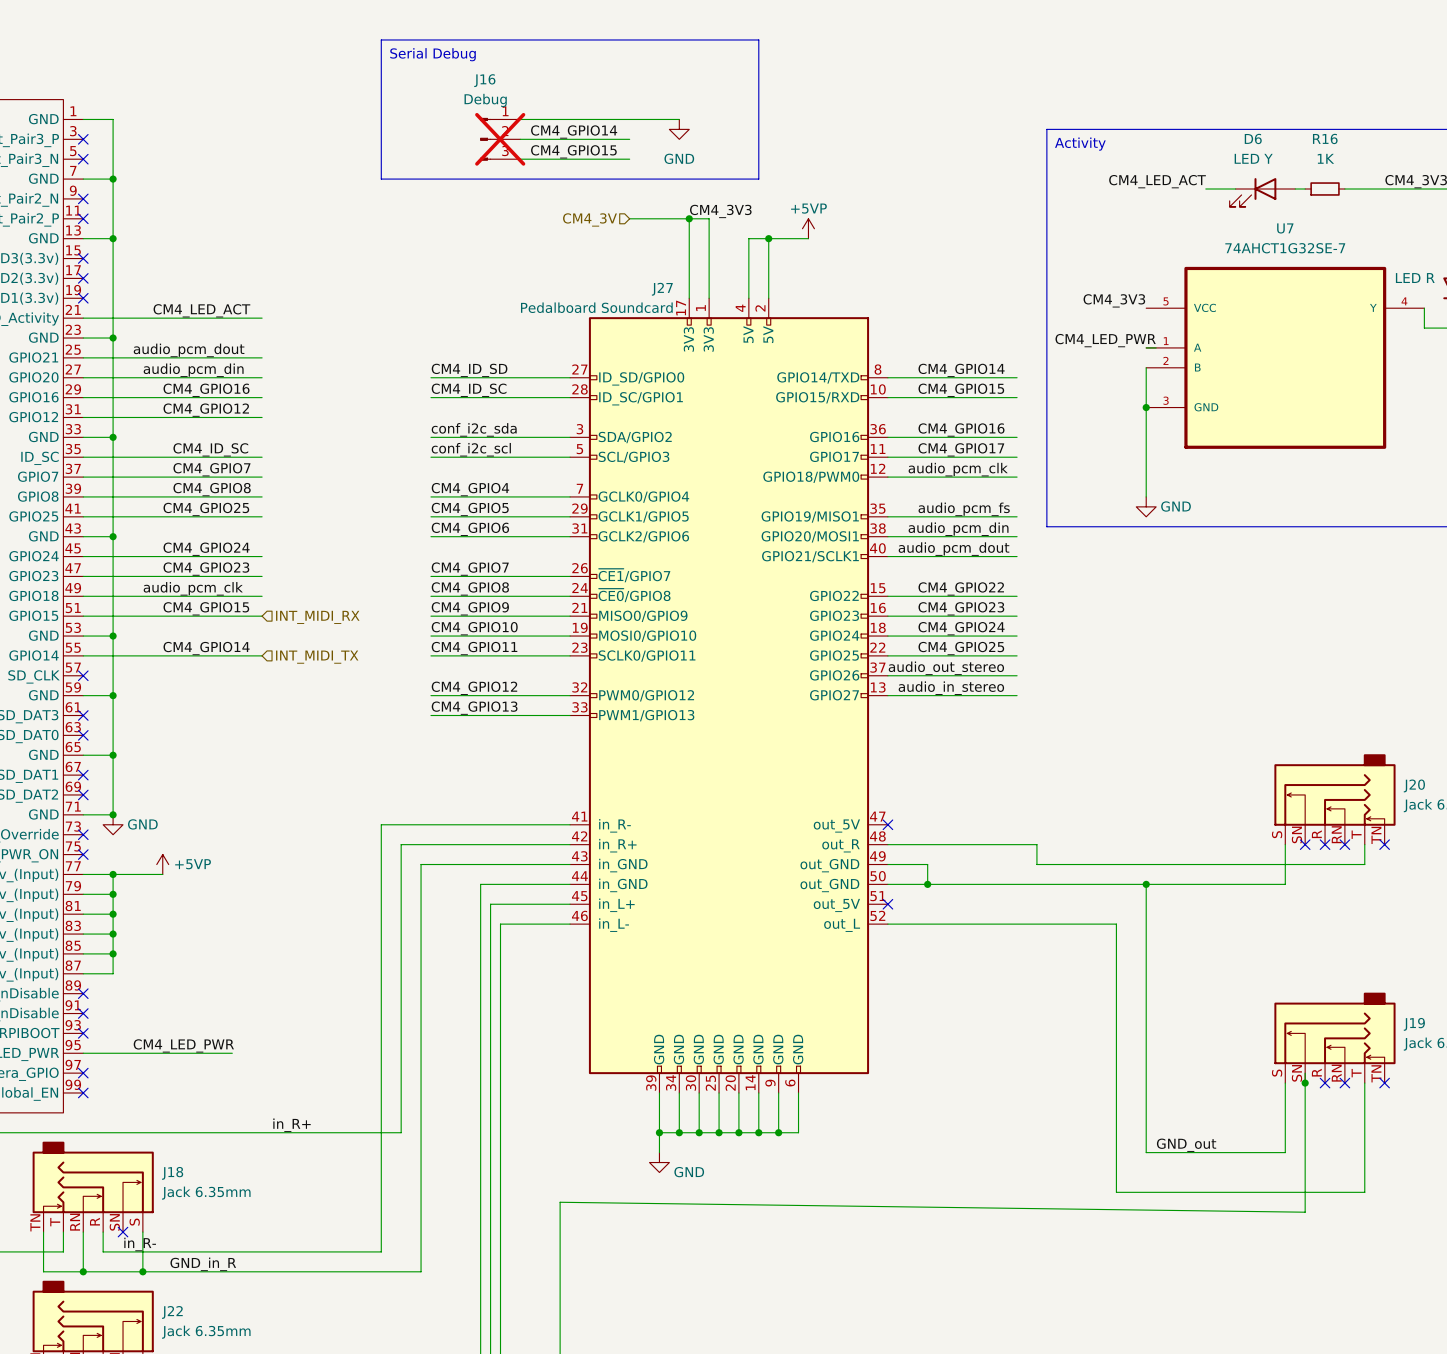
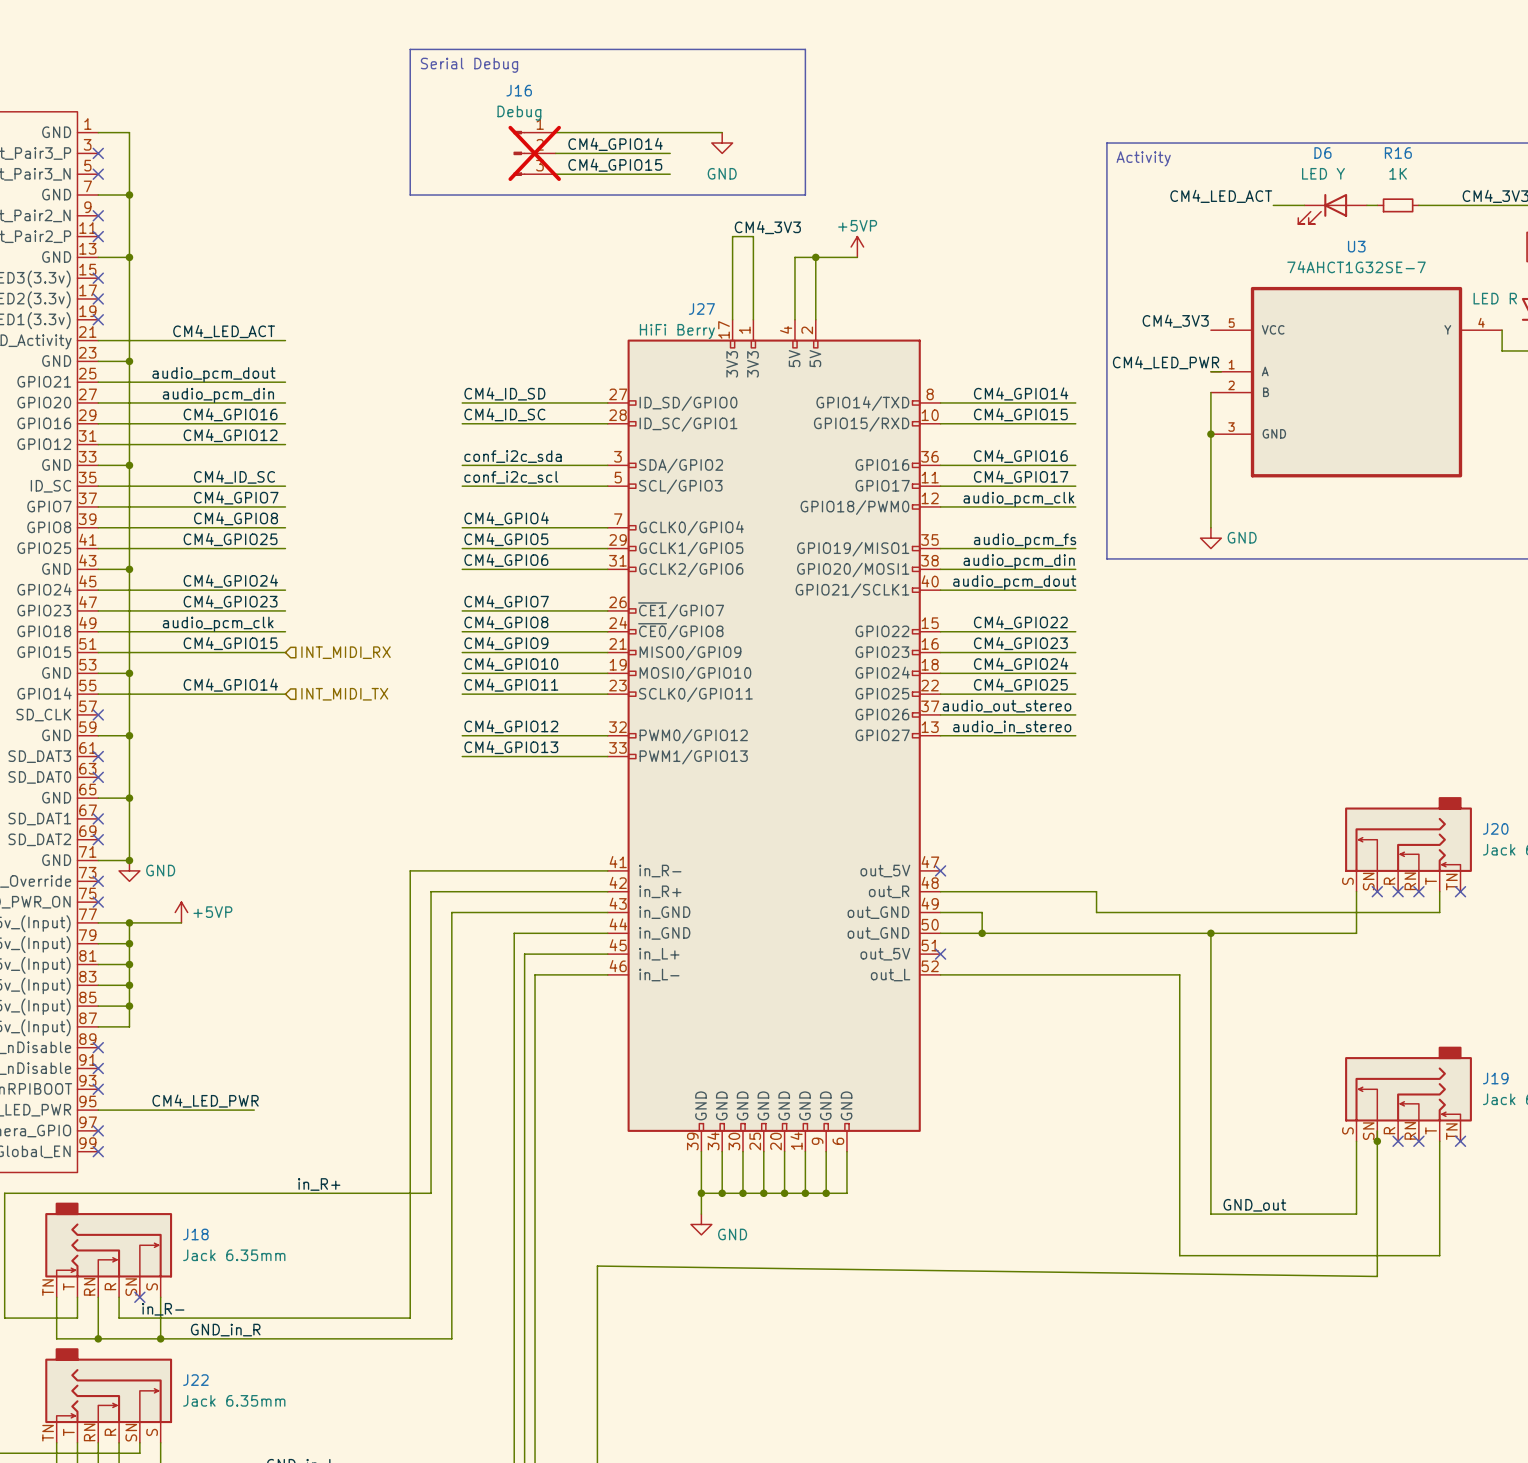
wire: (629, 218) (689, 218) -> none
junction: (689, 218) -> none
hierarchical label: CM4_3V (589, 219) -> none
U7 name: U7 (1285, 228) -> U3 (1356, 246)
J27 value: Pedalboard Soundcard (596, 307) -> HiFi Berry (677, 331)

